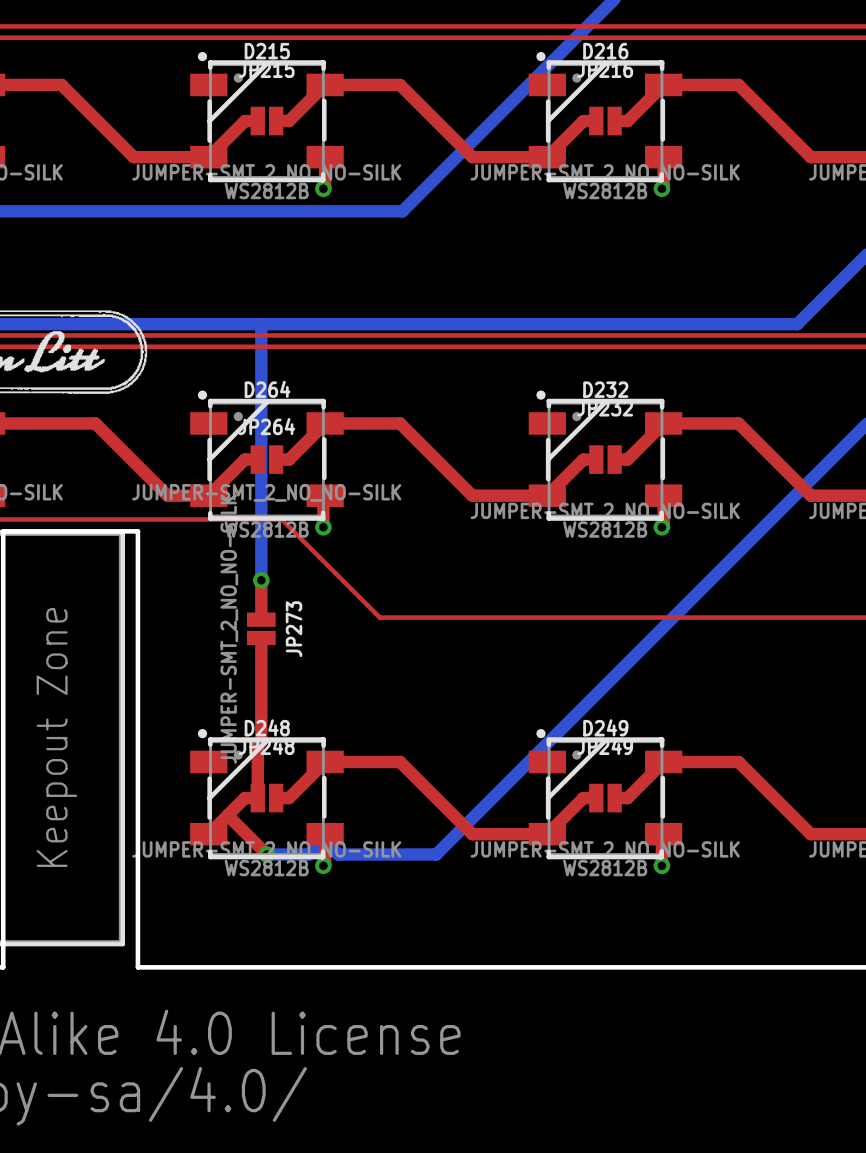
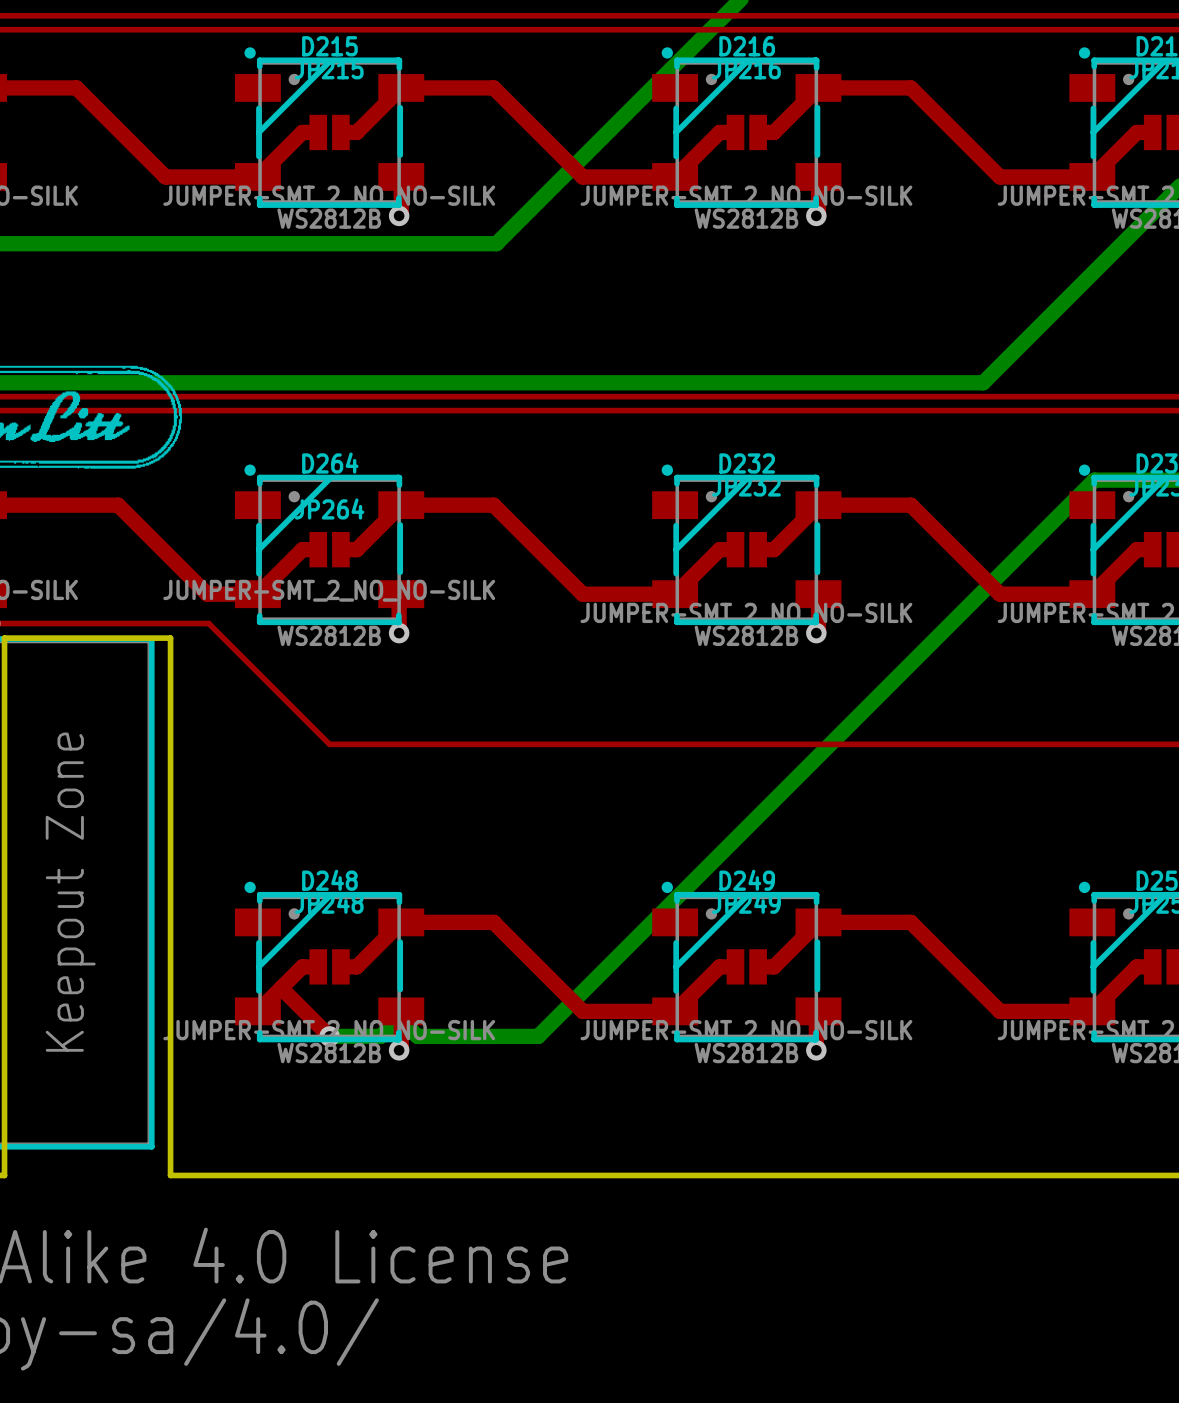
bottom track: (261, 324) (261, 580) -> none
top track: (168, 519) (281, 519) (379, 617) -> (208, 623) (329, 744) (468, 744)
top track: (261, 580) (261, 619) -> none
via: (261, 580) -> none
JP273: JUMPER-SMT_2_NO_NO-SILK (261, 628) -> none
top track: (261, 638) (261, 741) (257, 745) (257, 798) -> none

